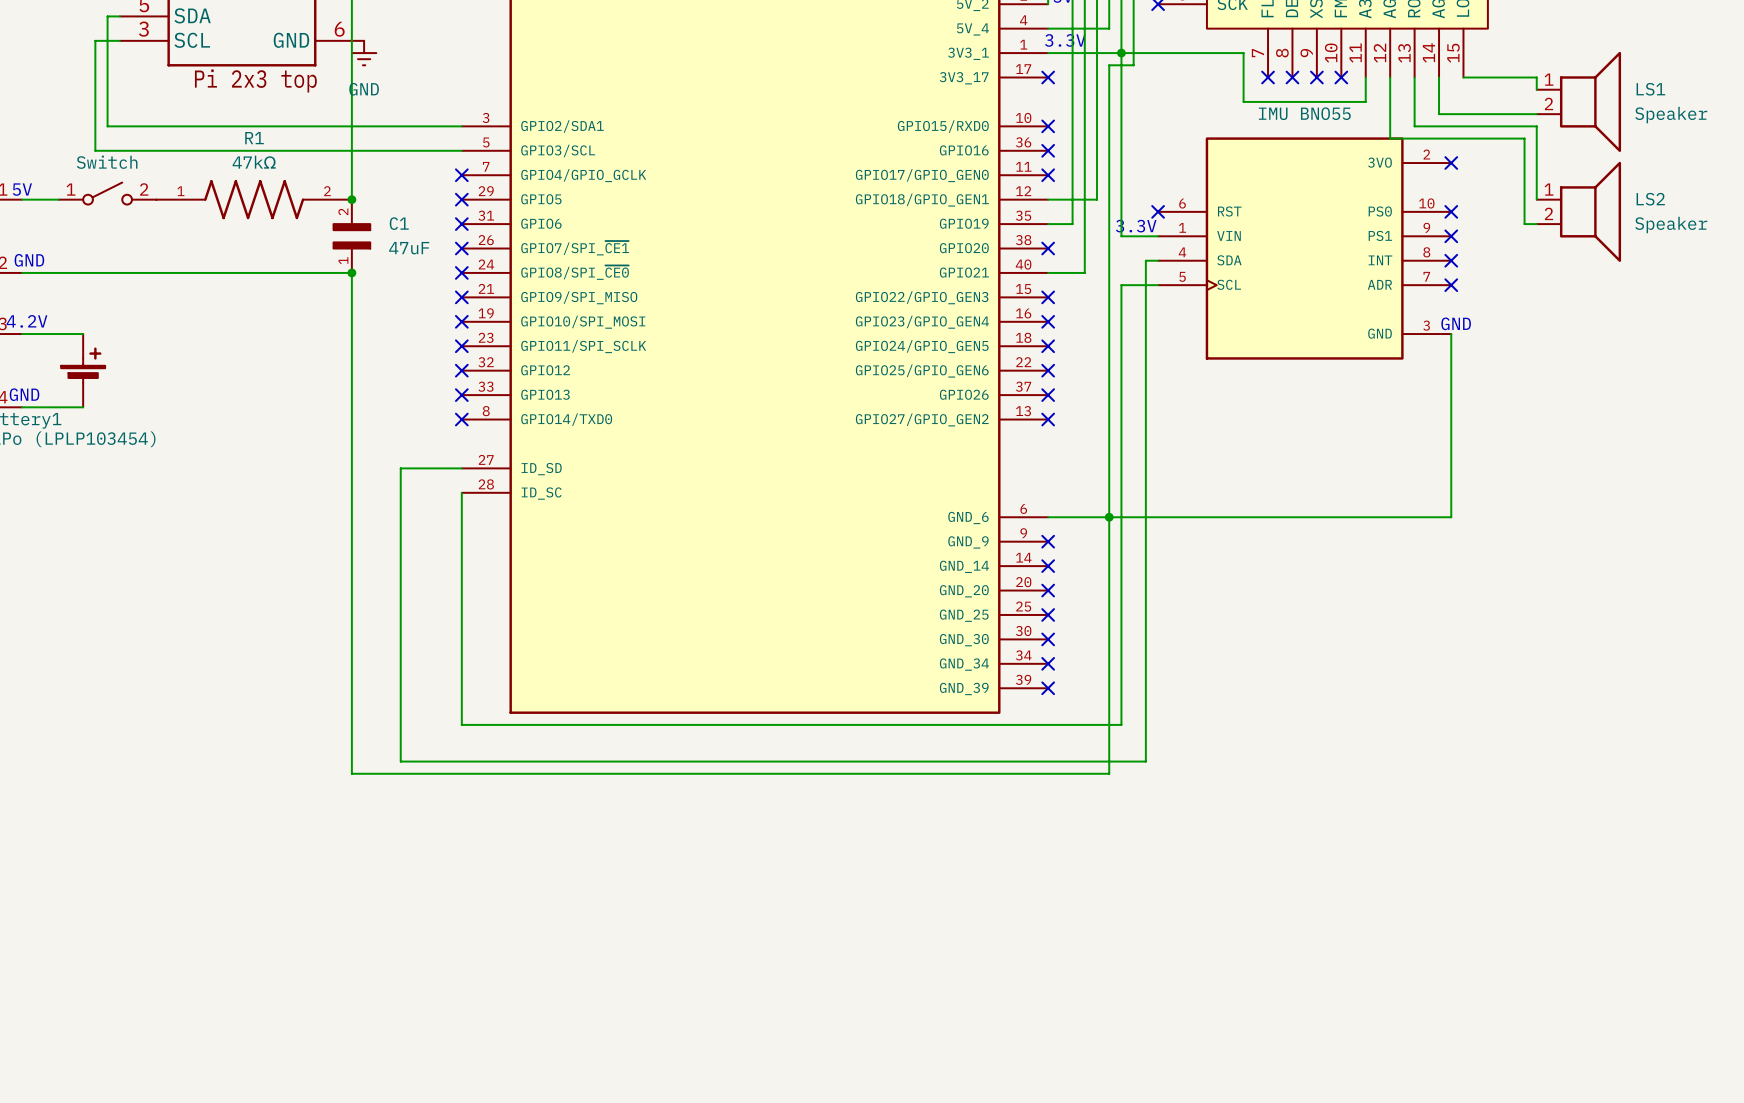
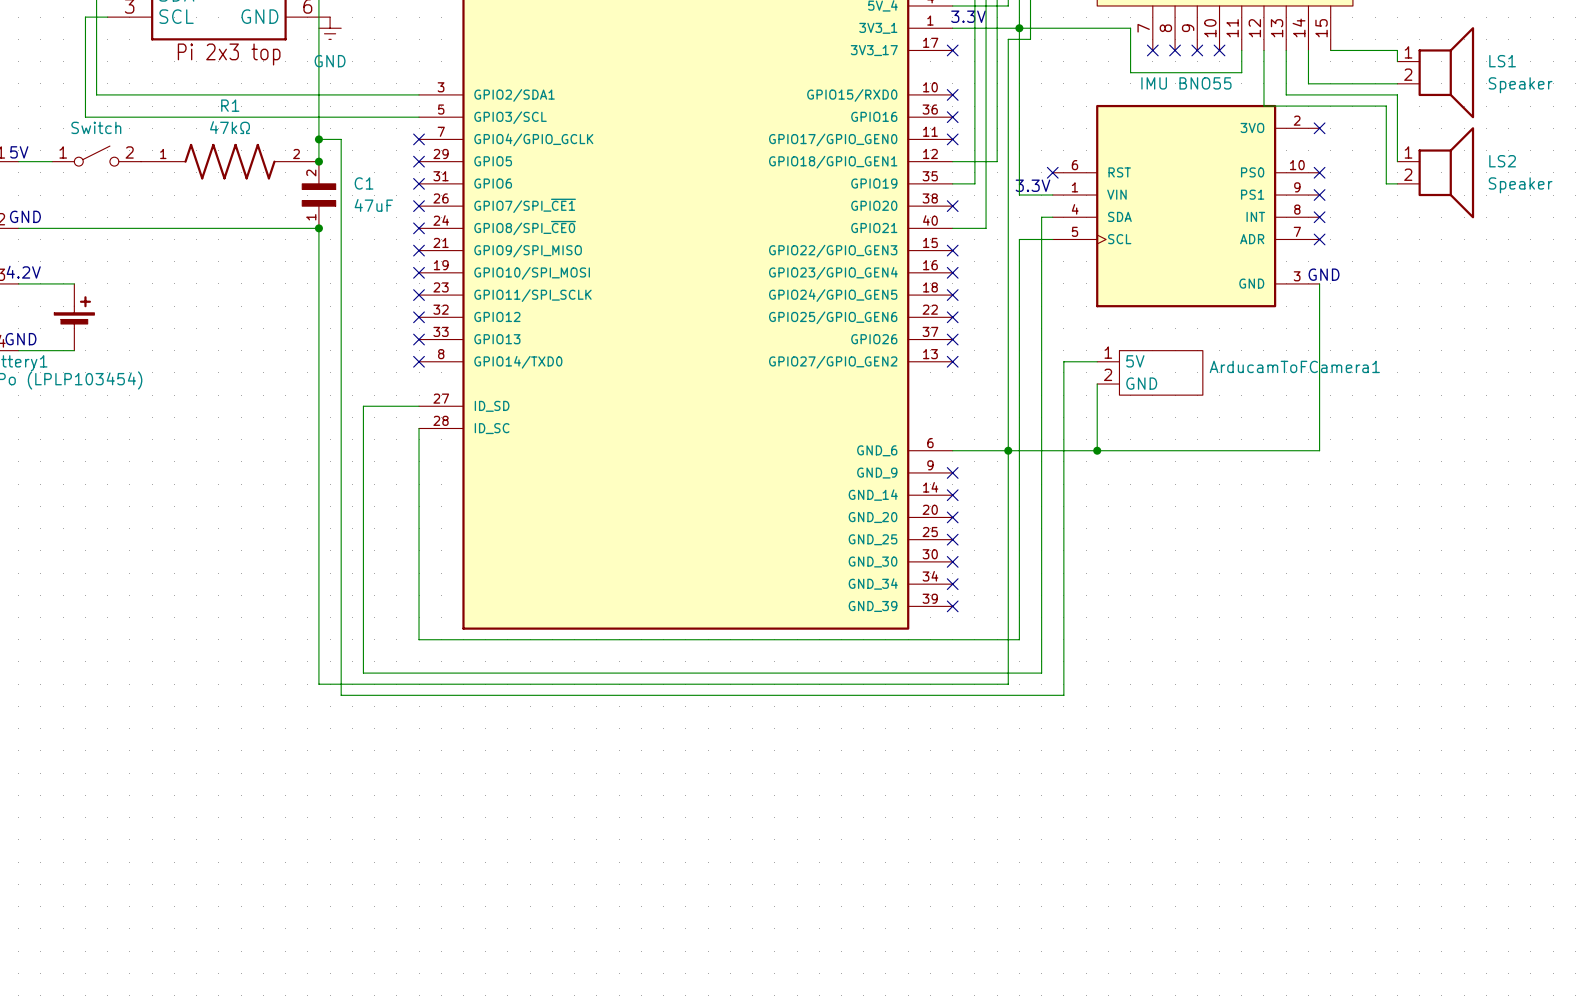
wire: none -> (318, 139) (341, 139) (341, 695) (1063, 695) (1063, 361) (1097, 361)
junction: none -> (318, 139)
ArducamToFCamera1: none -> (1150, 372)
wire: none -> (1097, 384) (1097, 450)
junction: none -> (1097, 450)

